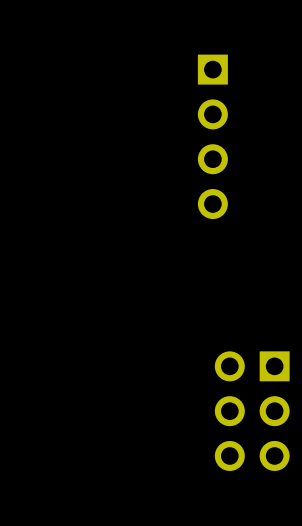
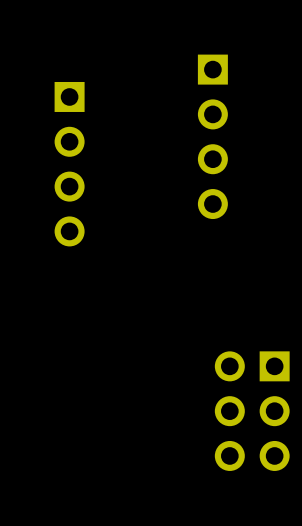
part: none -> (69, 164)

